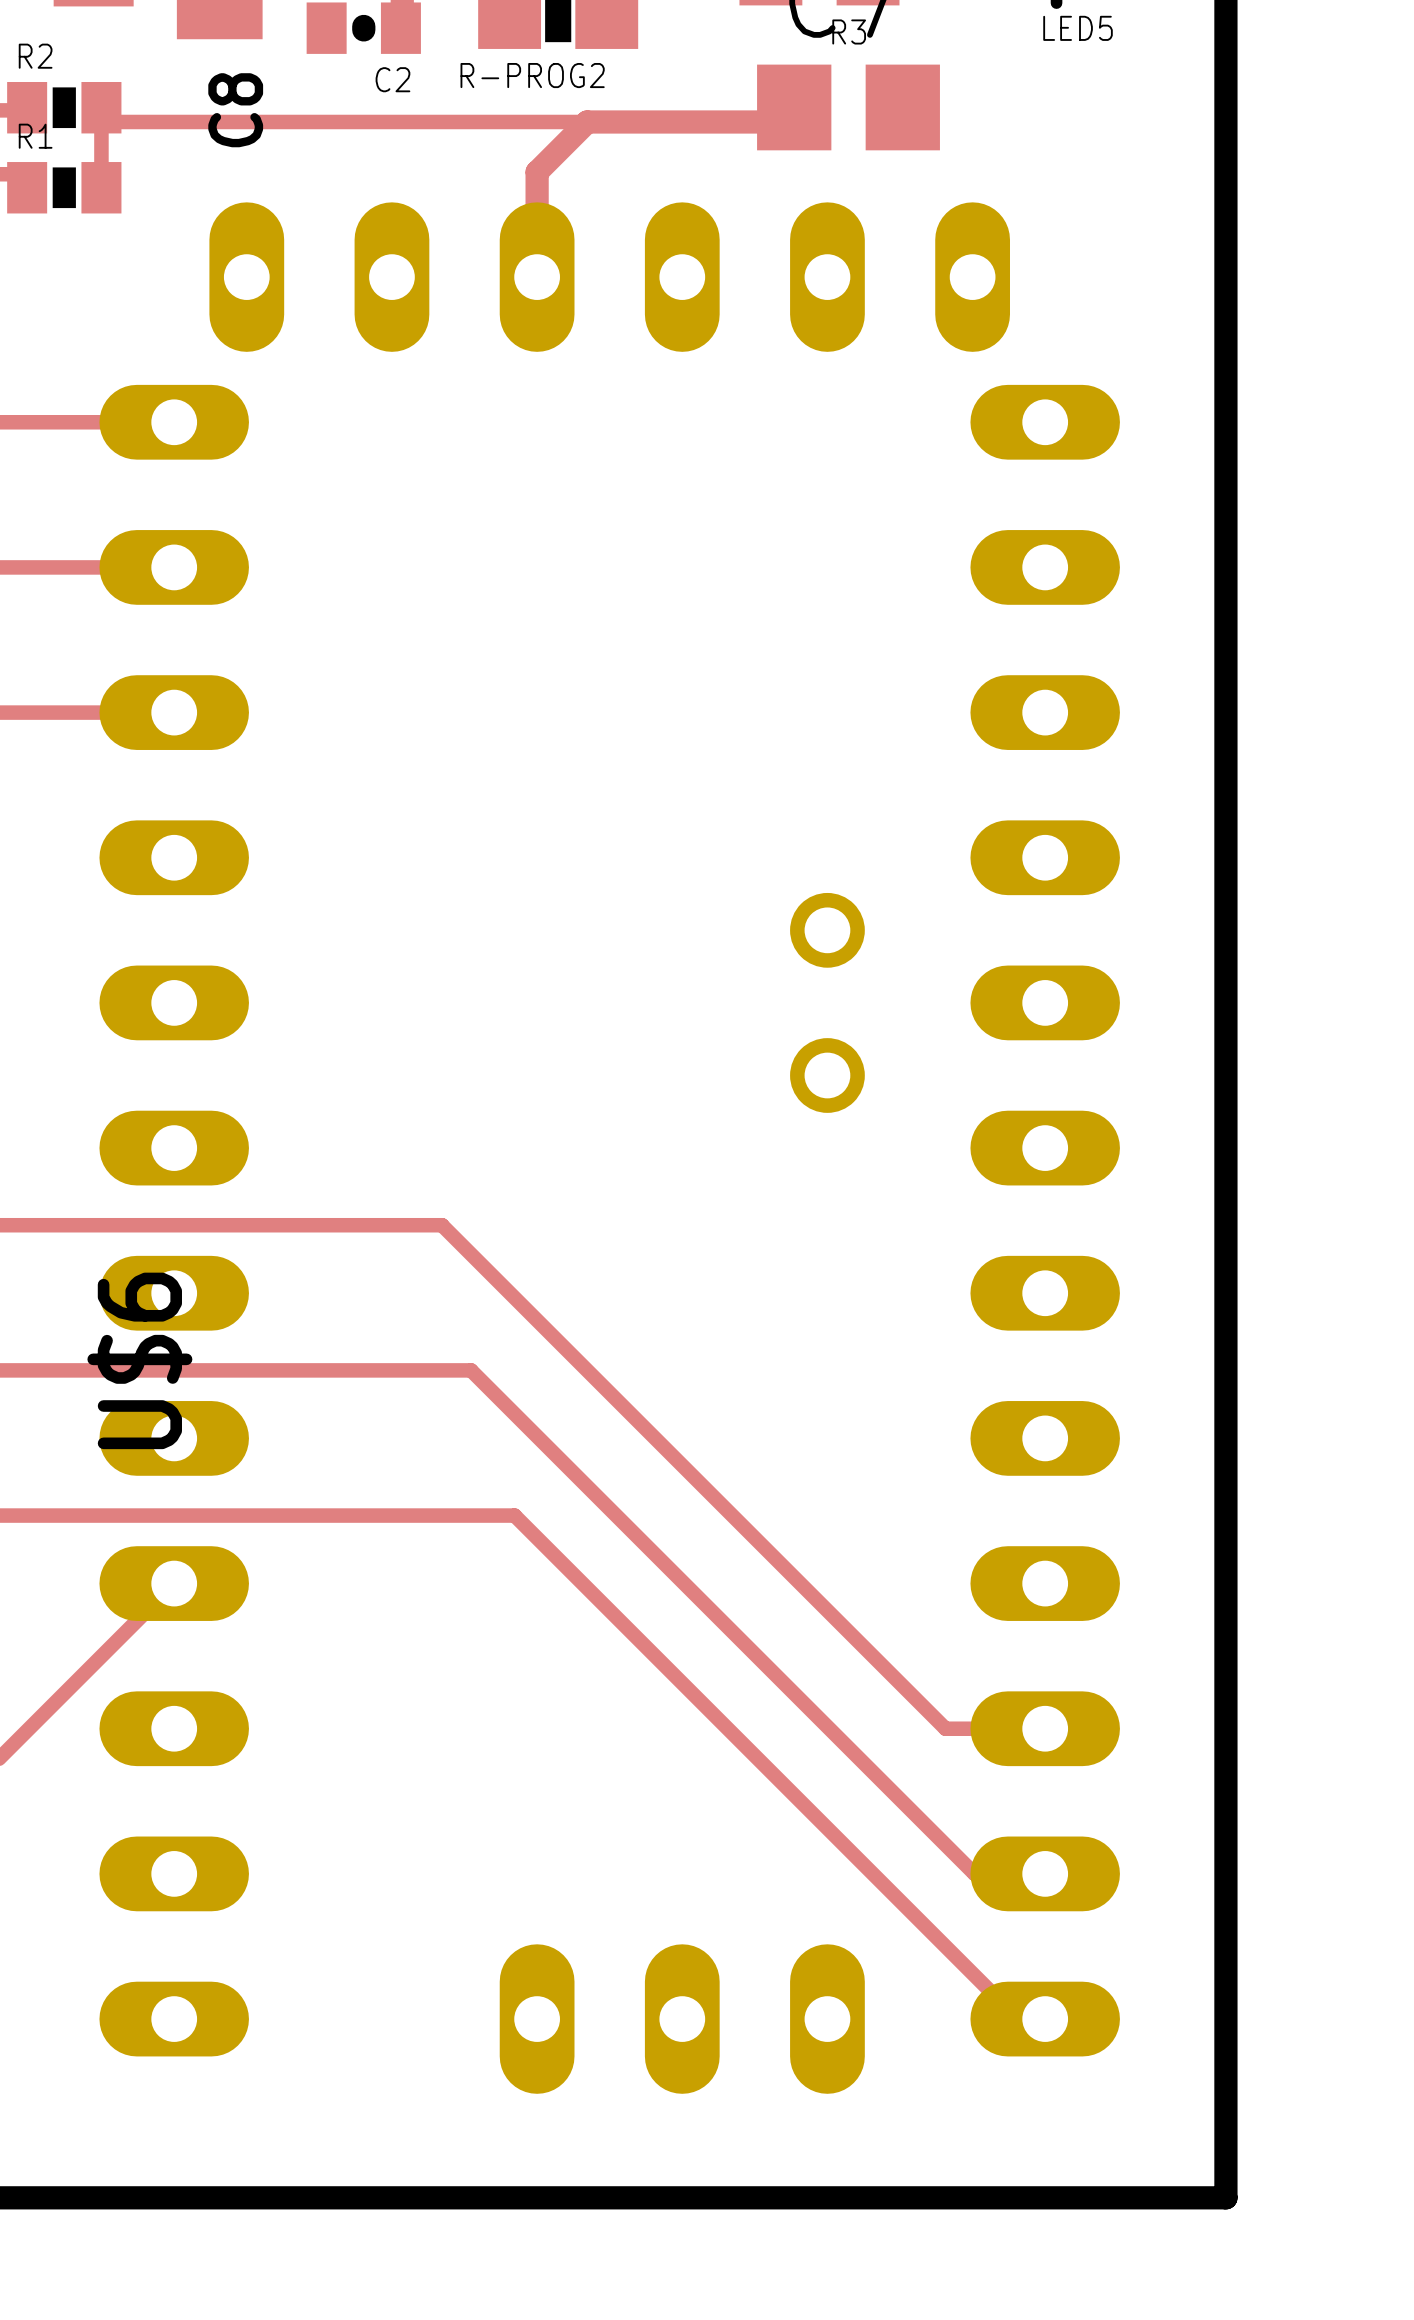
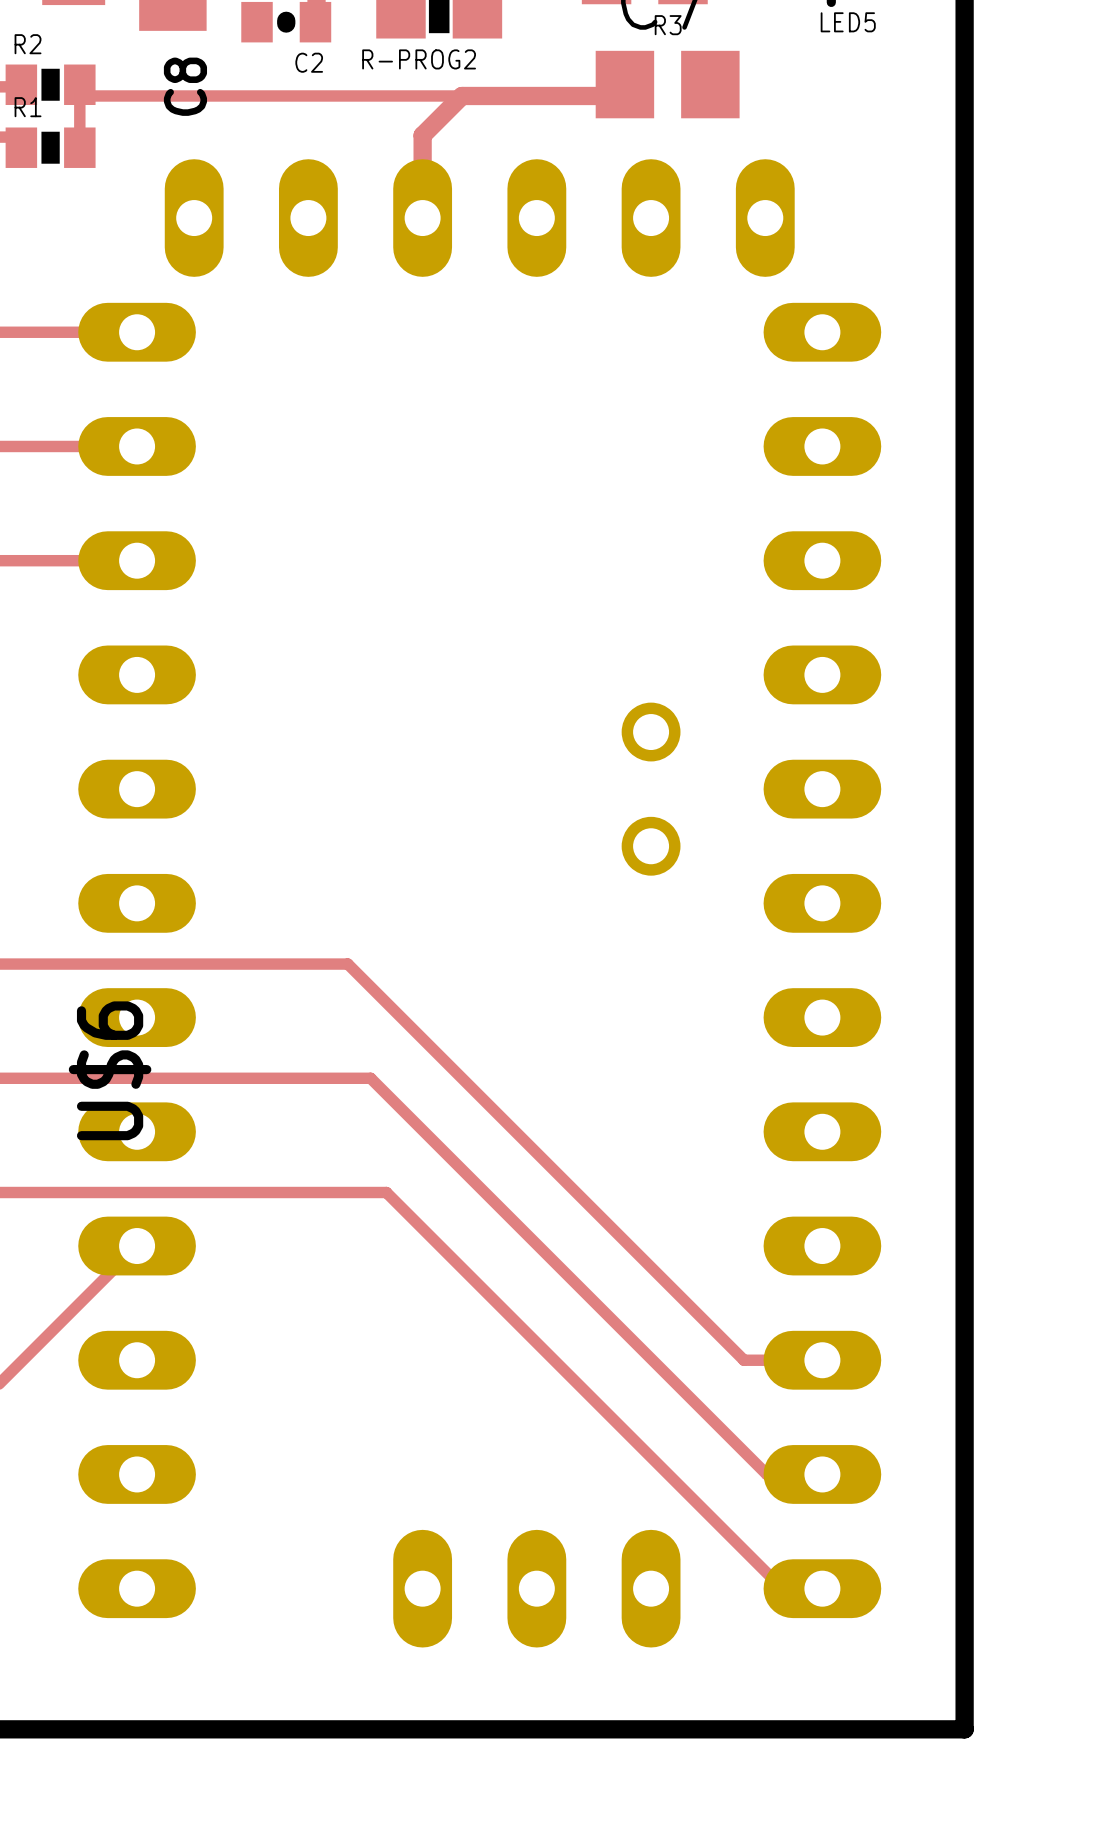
track: (491, 1515) (514, 1515) (1018, 2019) -> (386, 1192) (781, 1587) (781, 1592) (785, 1588) (801, 1588)

